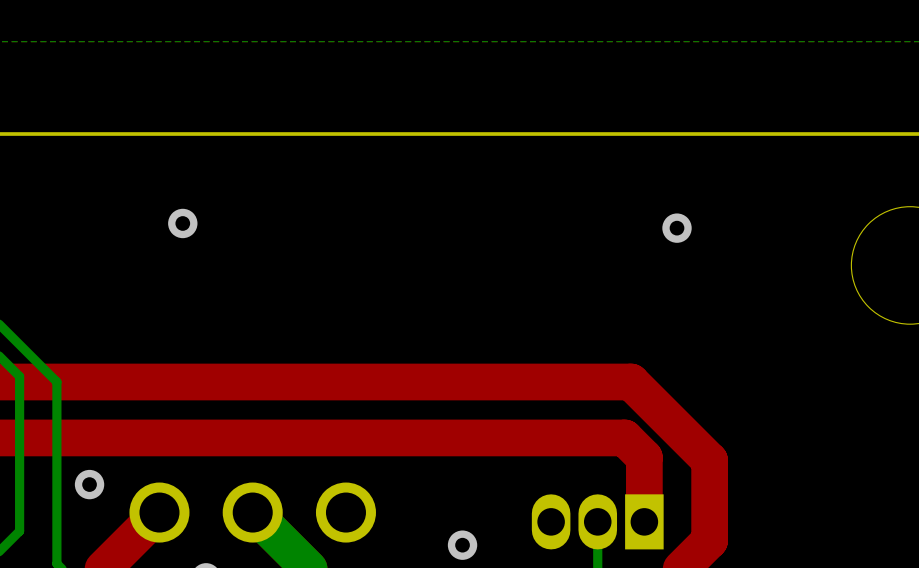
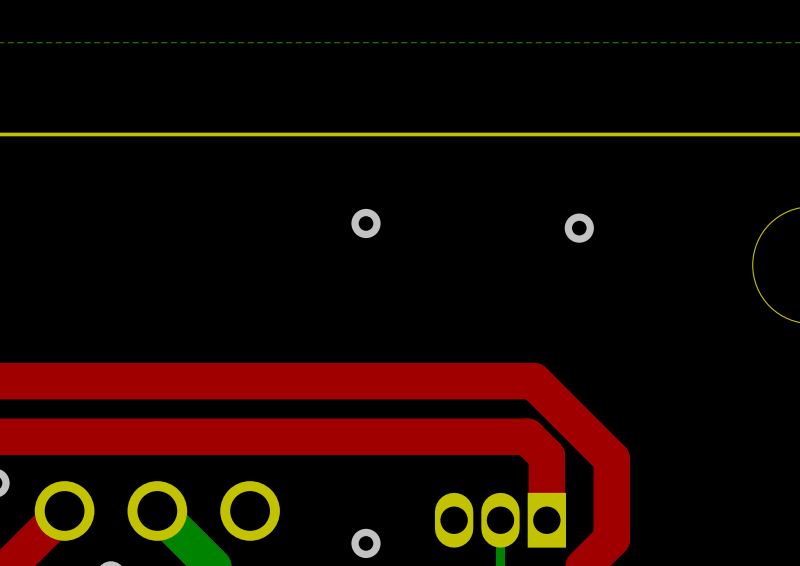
via: (182, 223) -> none
via: none -> (366, 223)

